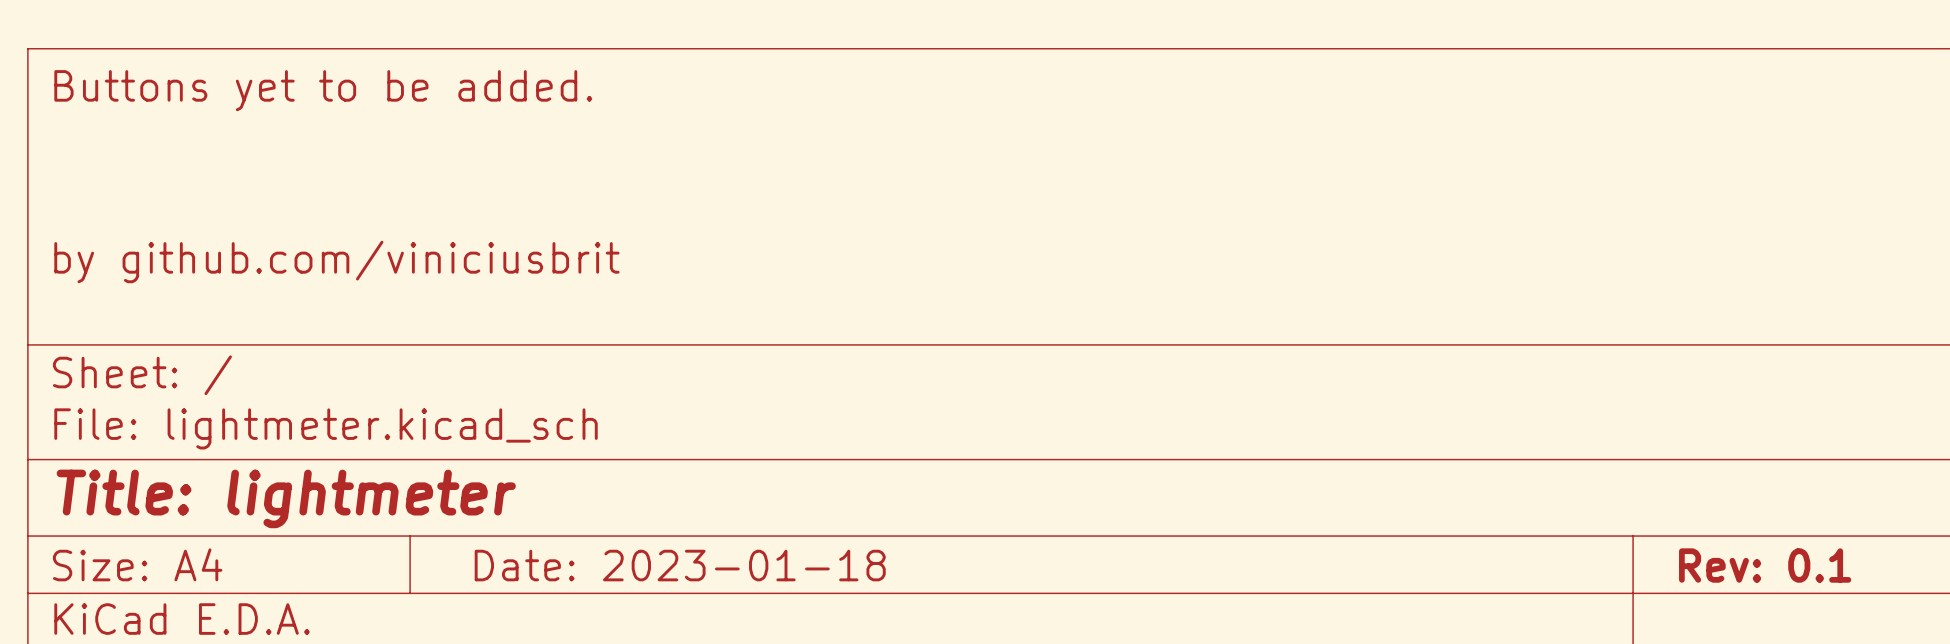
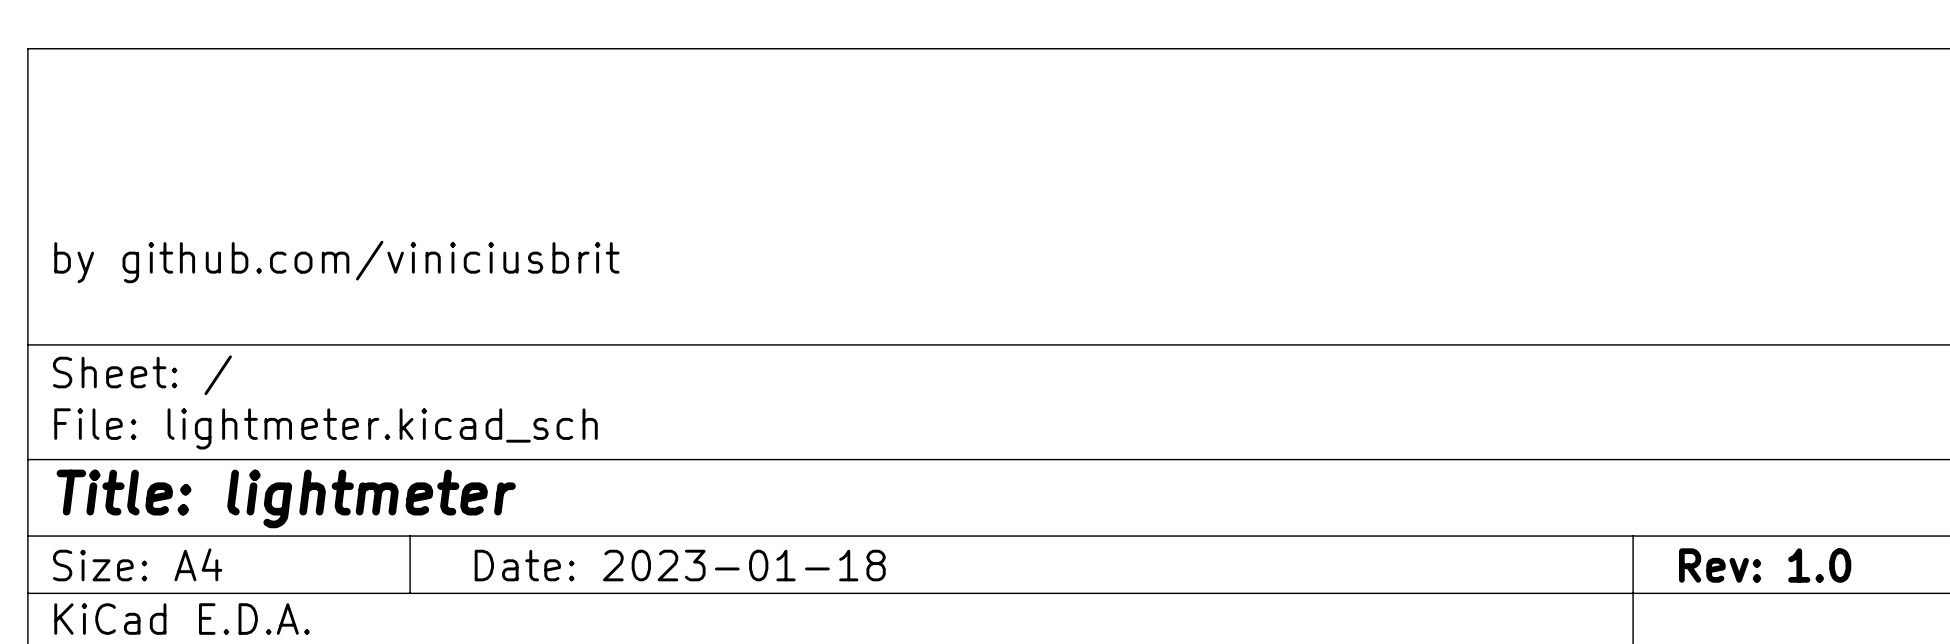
title block: Buttons yet to be added. (323, 90) -> none
title block: Rev: 0.1 (1765, 565) -> Rev: 1.0 (1765, 565)

